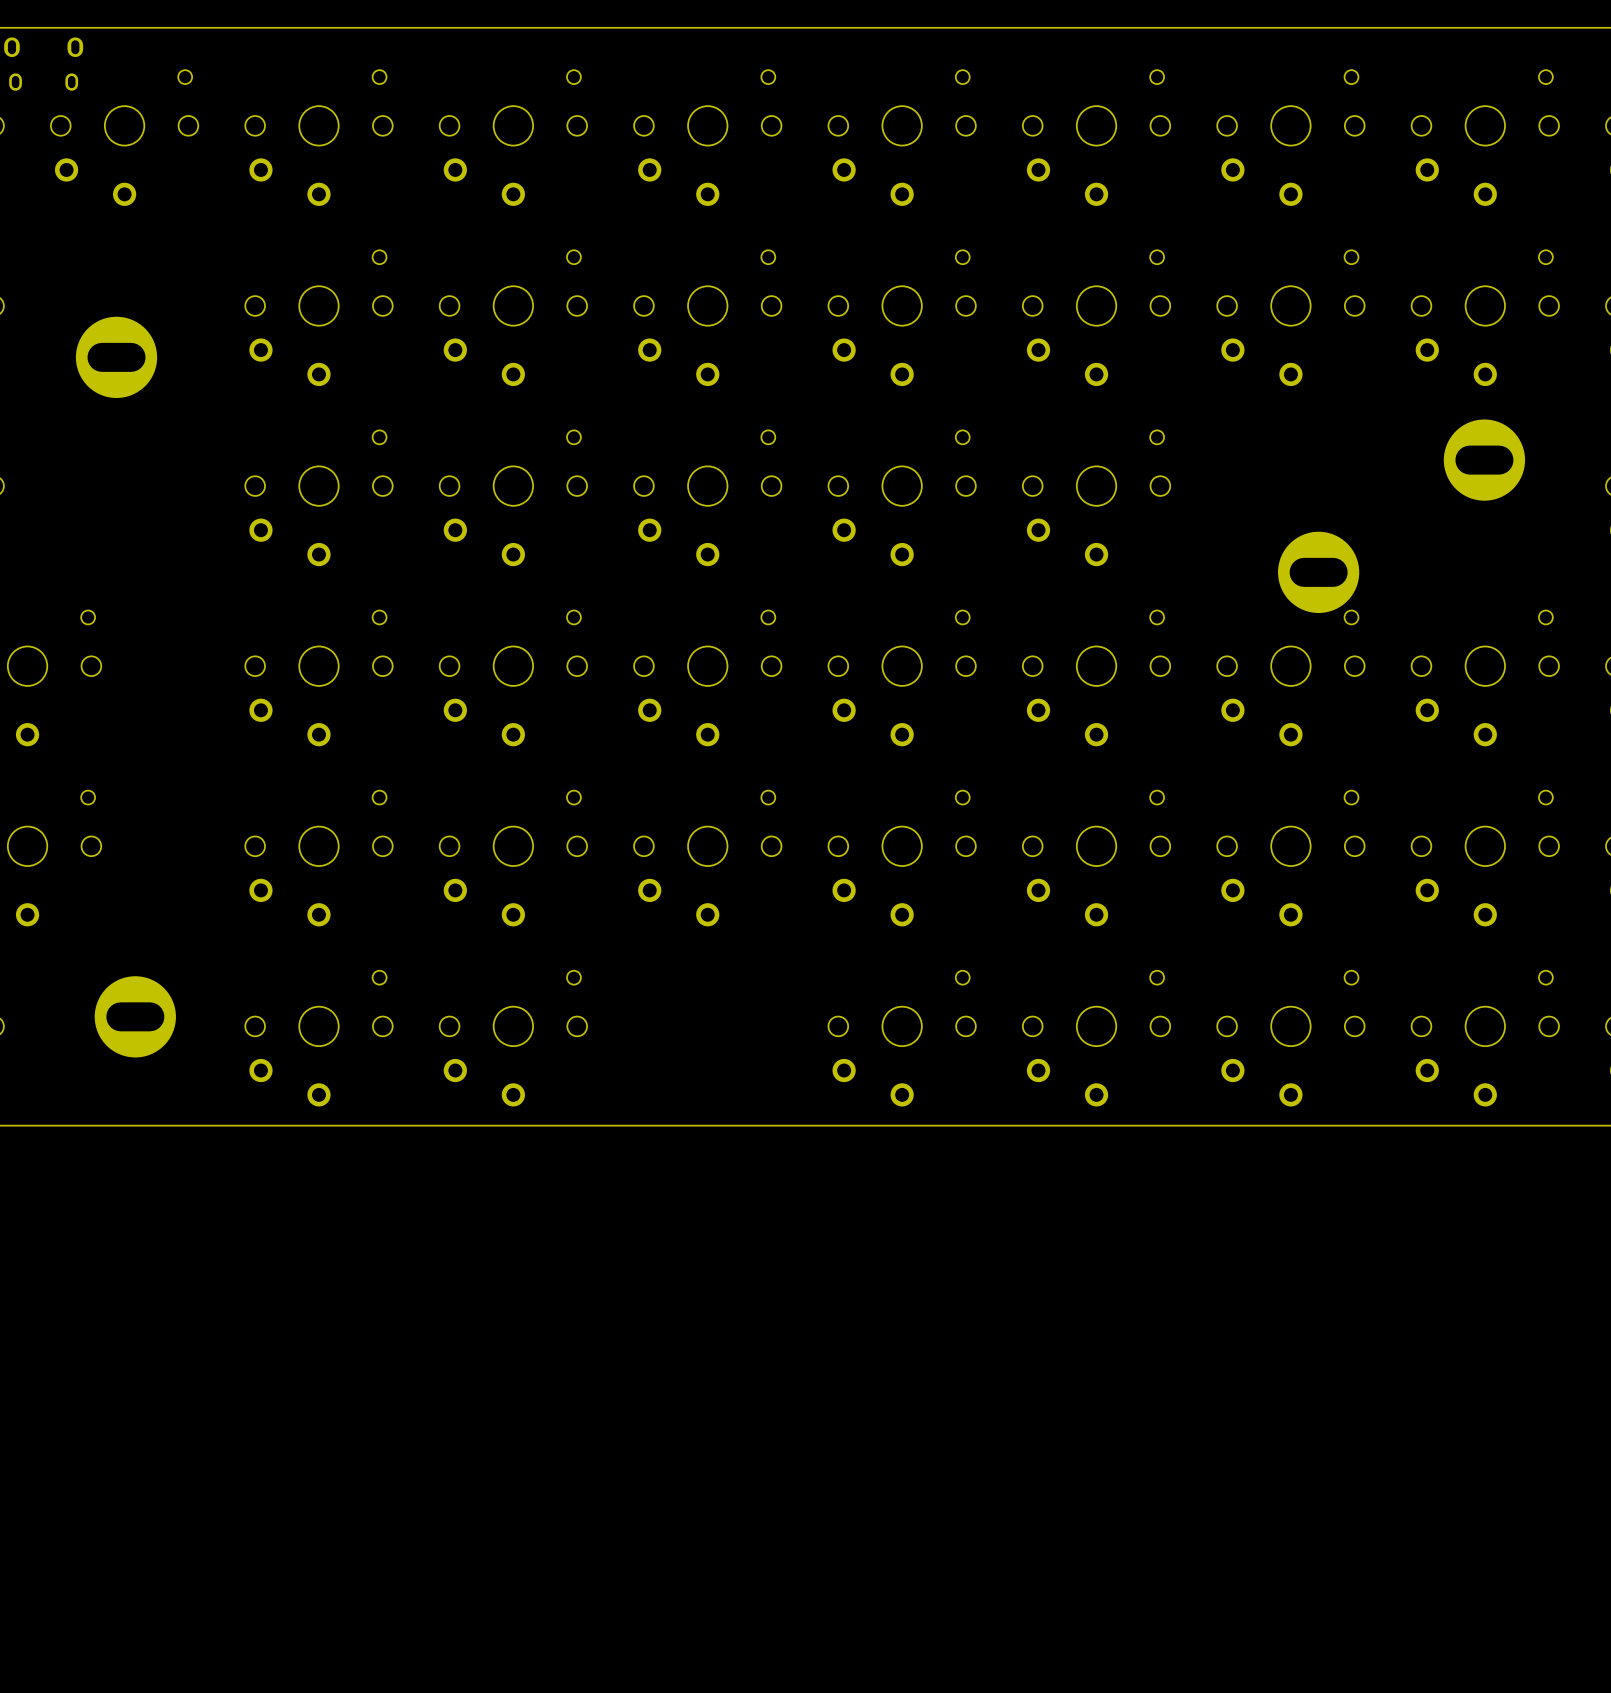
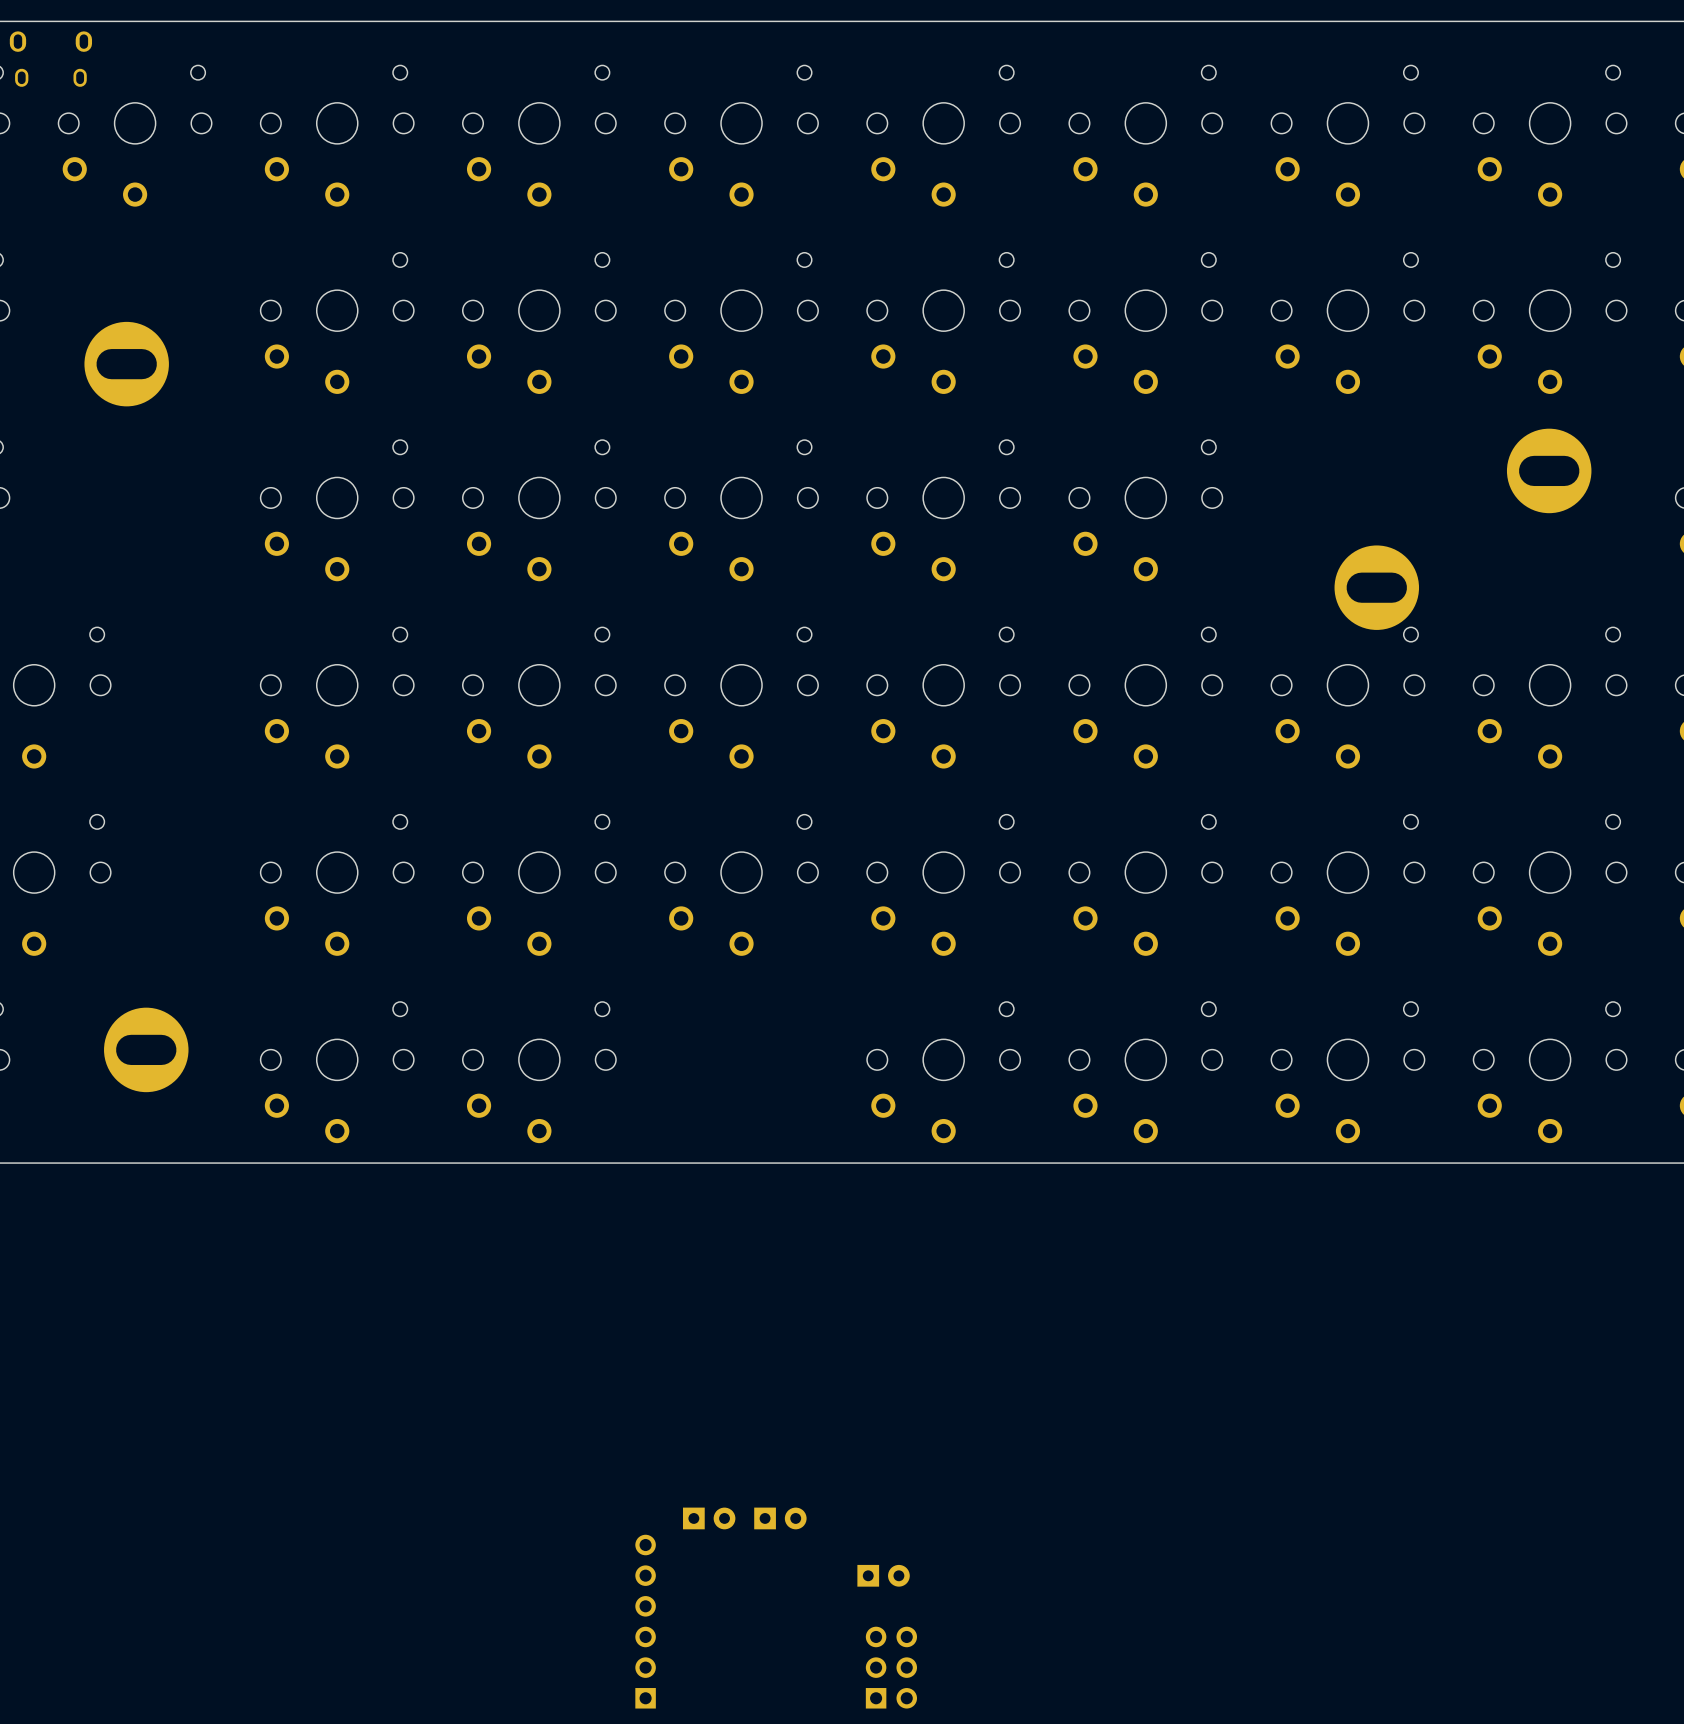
part: none -> (709, 1518)
part: none -> (780, 1518)
part: none -> (883, 1575)
part: none -> (645, 1621)
part: none -> (891, 1667)

